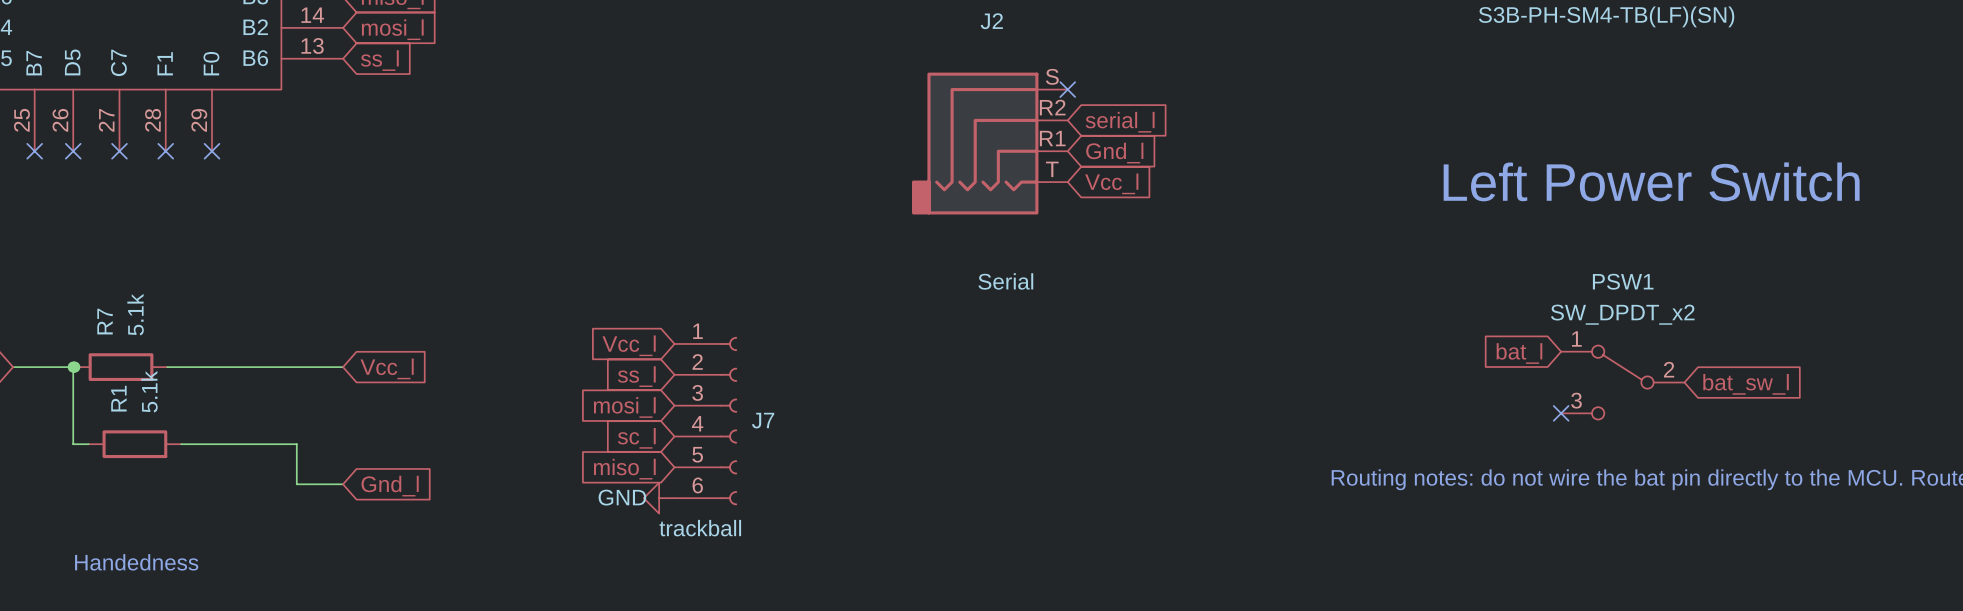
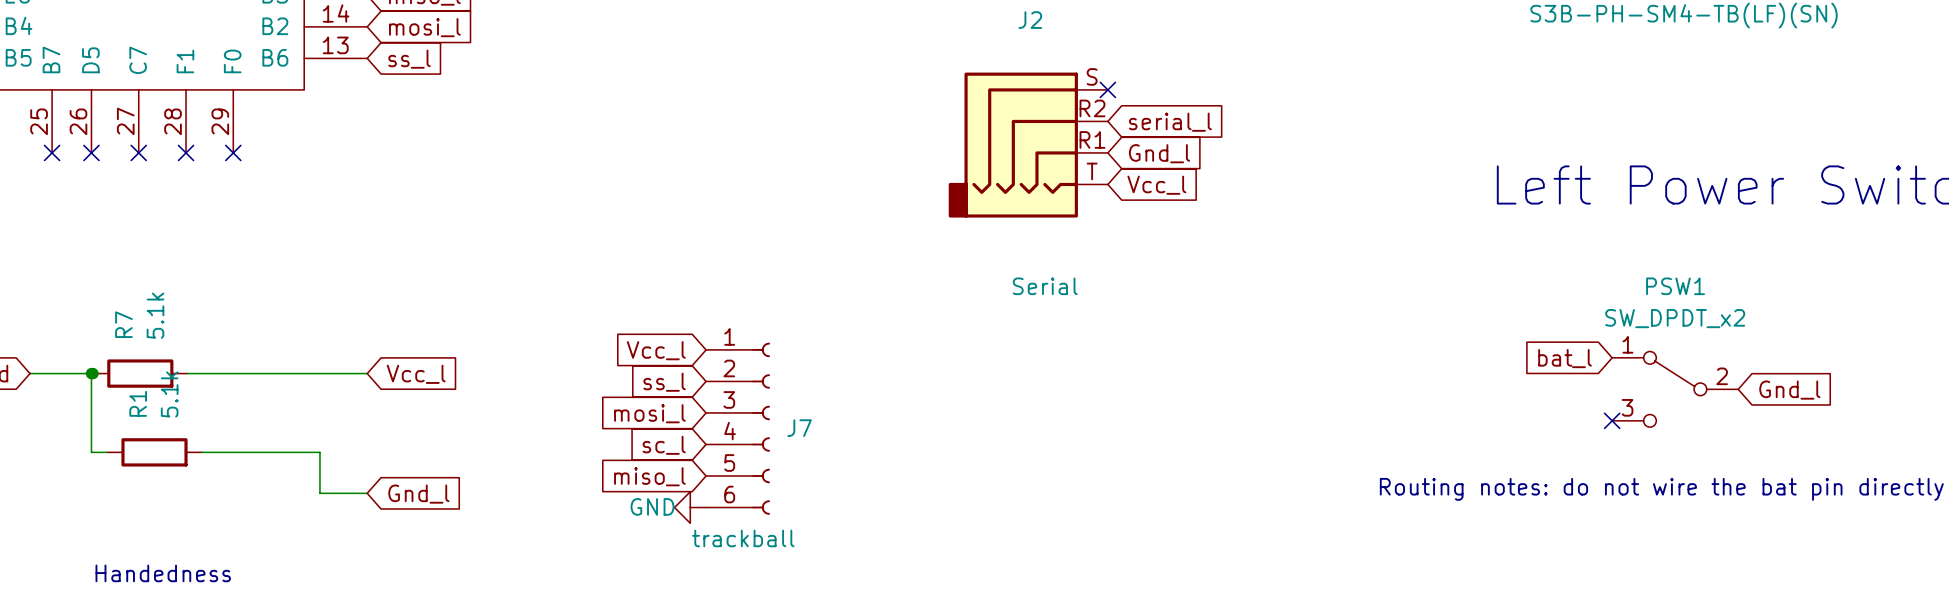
global label: bat_sw_l (1746, 384) -> Gnd_l (1789, 390)

